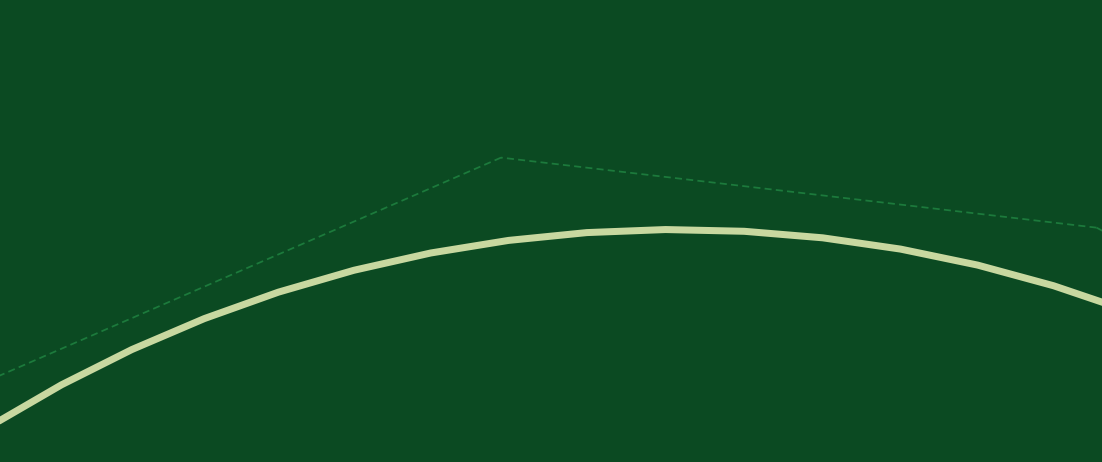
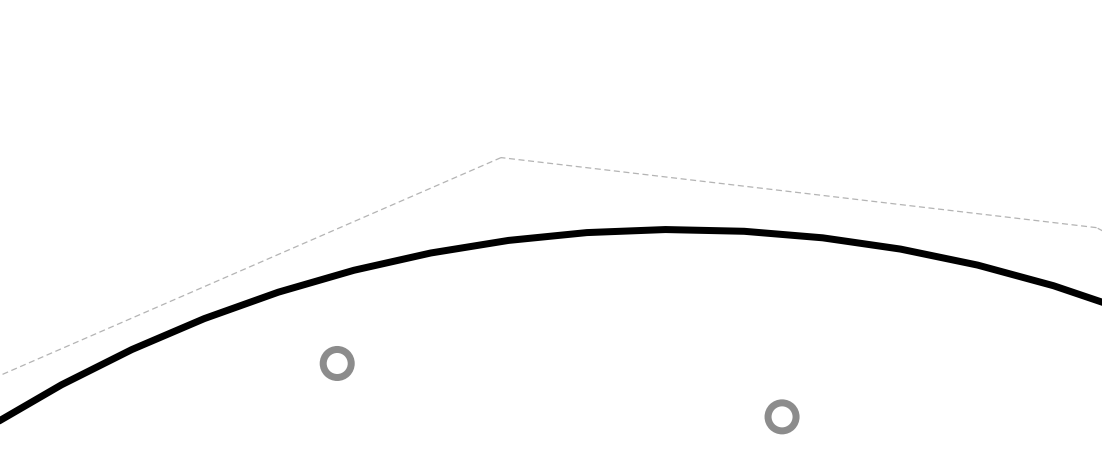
via: none -> (337, 363)
via: none -> (782, 416)

